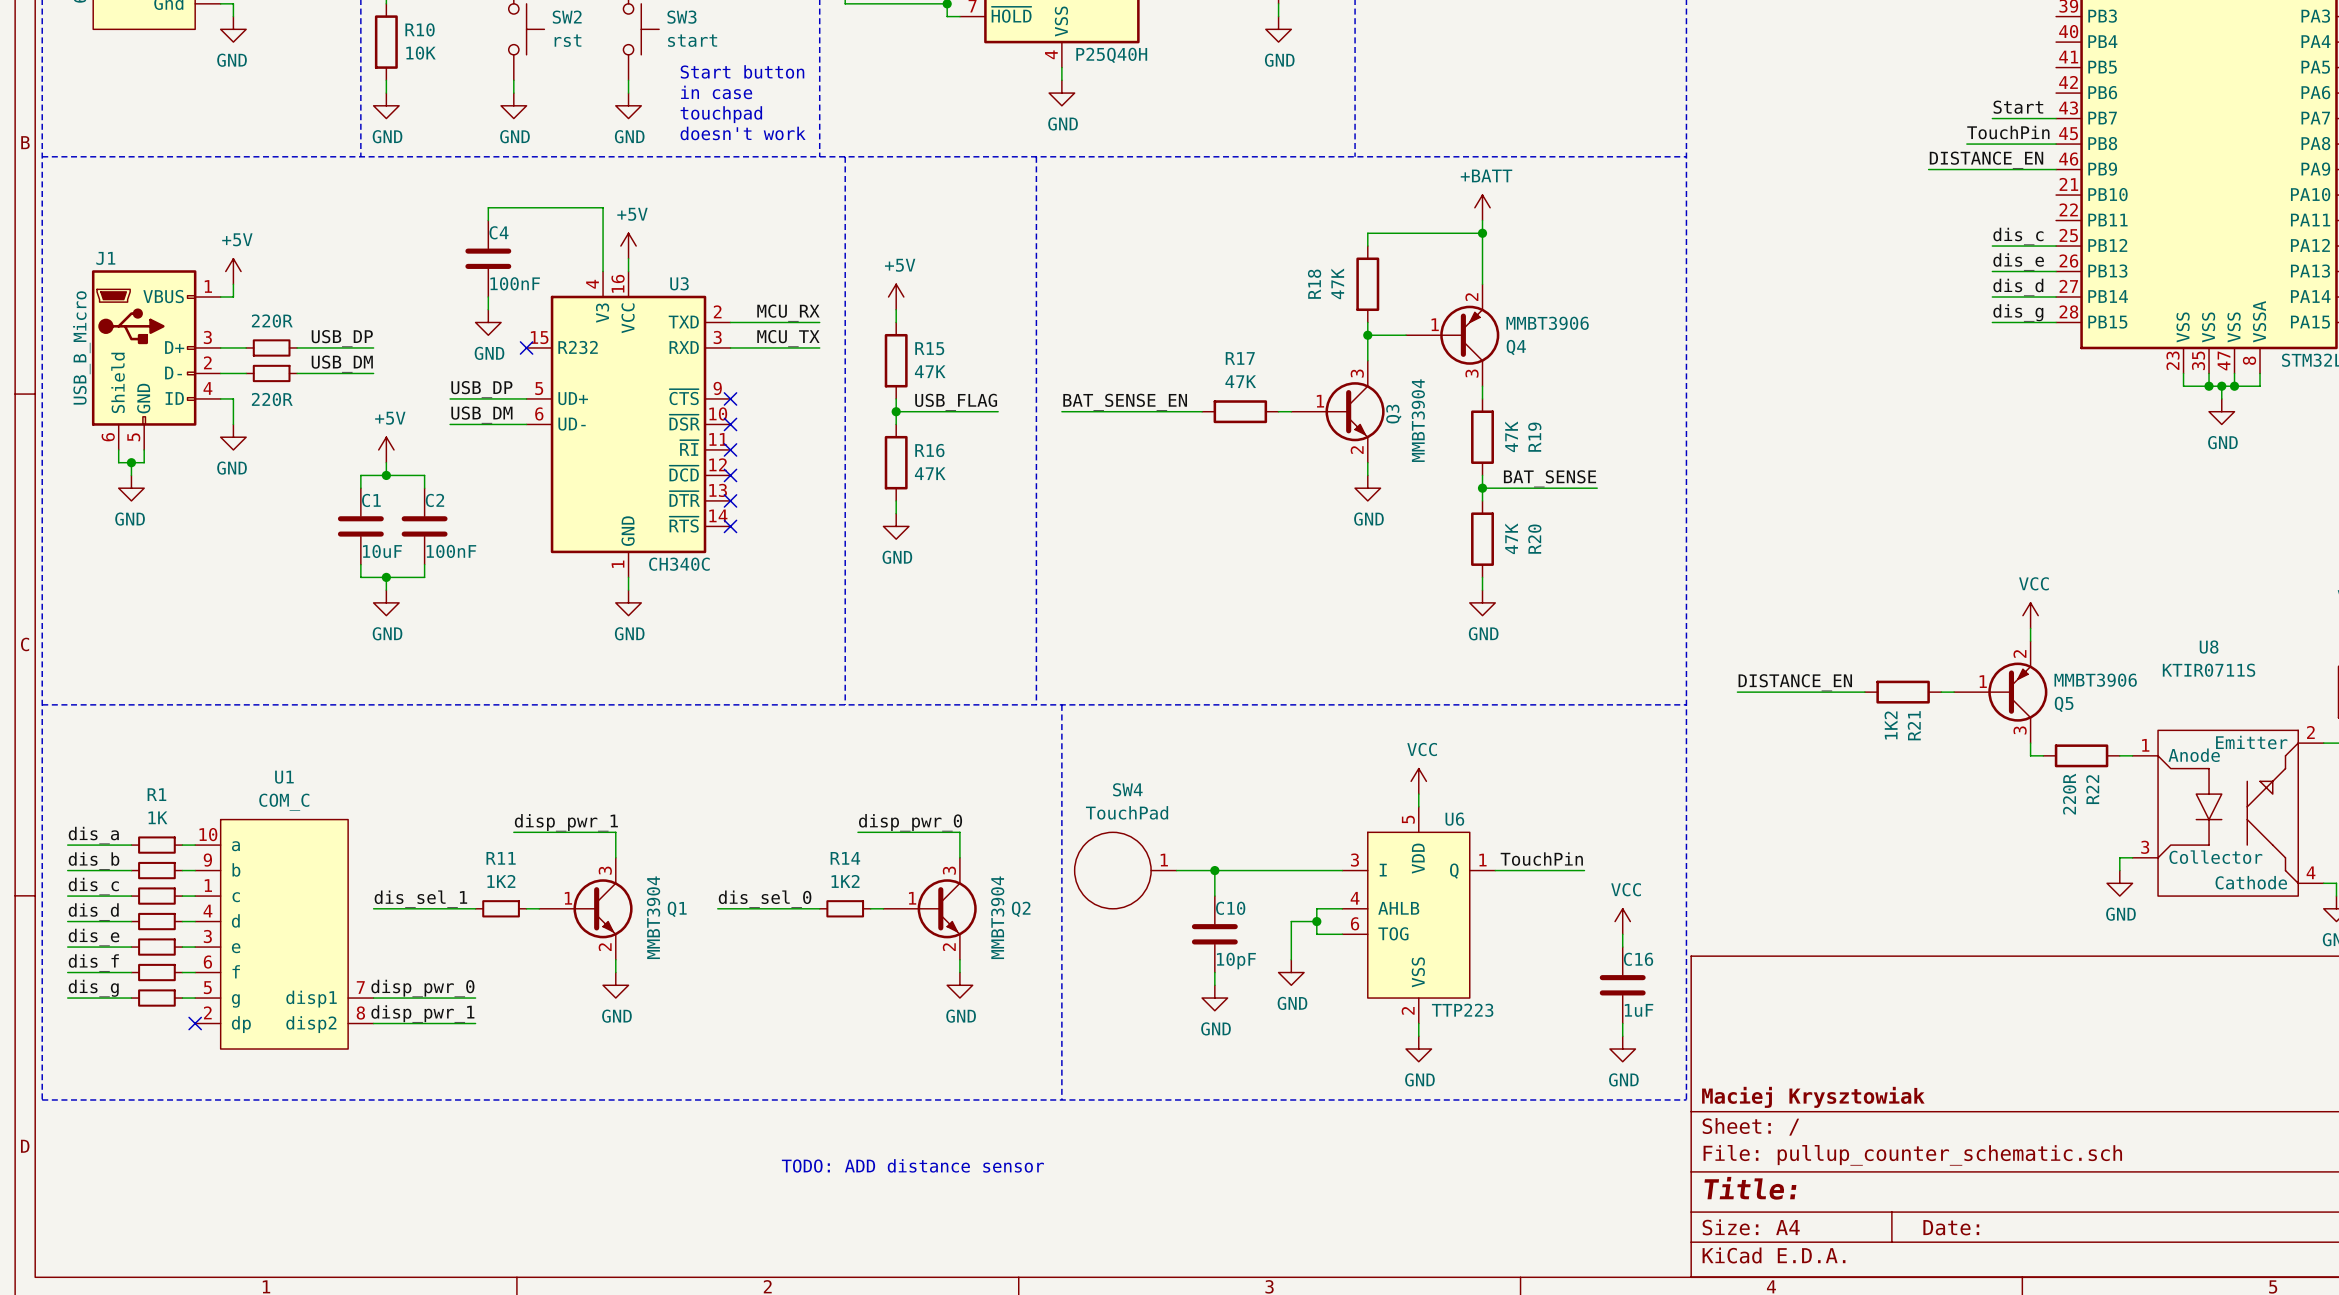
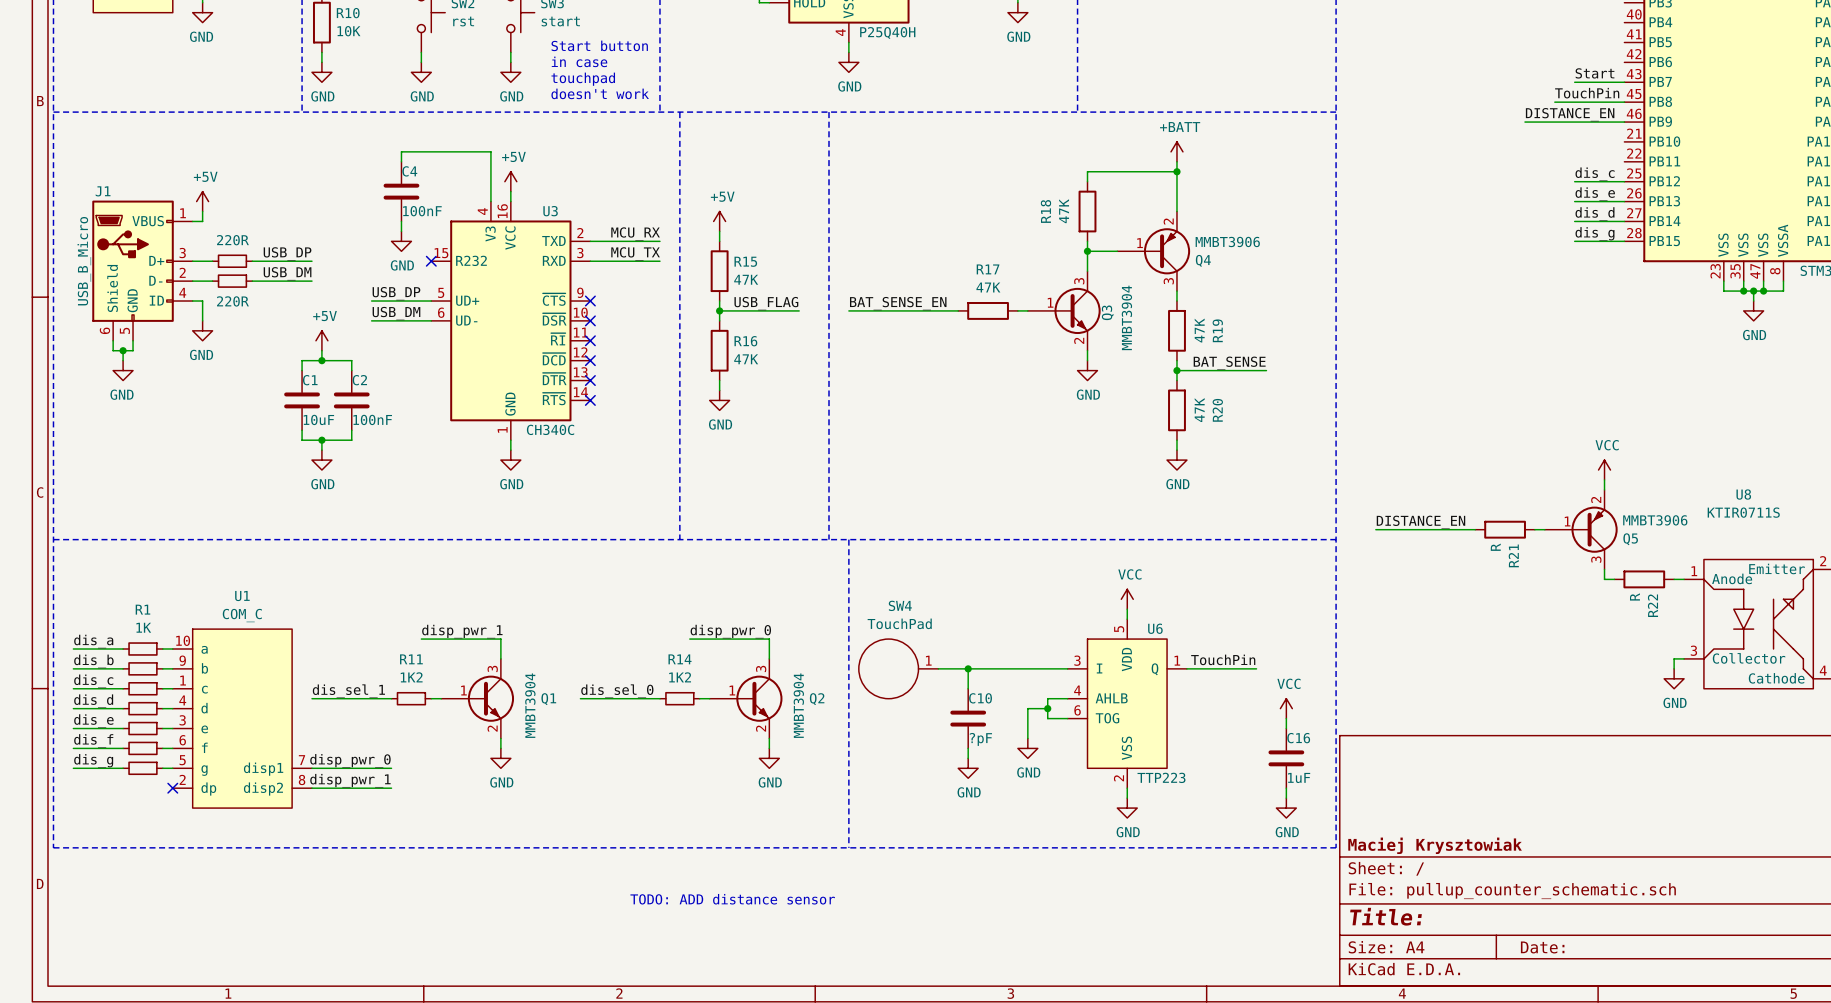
R21 value: 1K2 (1891, 725) -> R (1495, 547)
R22 value: 220R (2069, 794) -> R (1634, 596)
C10 value: 10pF (1236, 961) -> ?pF (980, 739)

